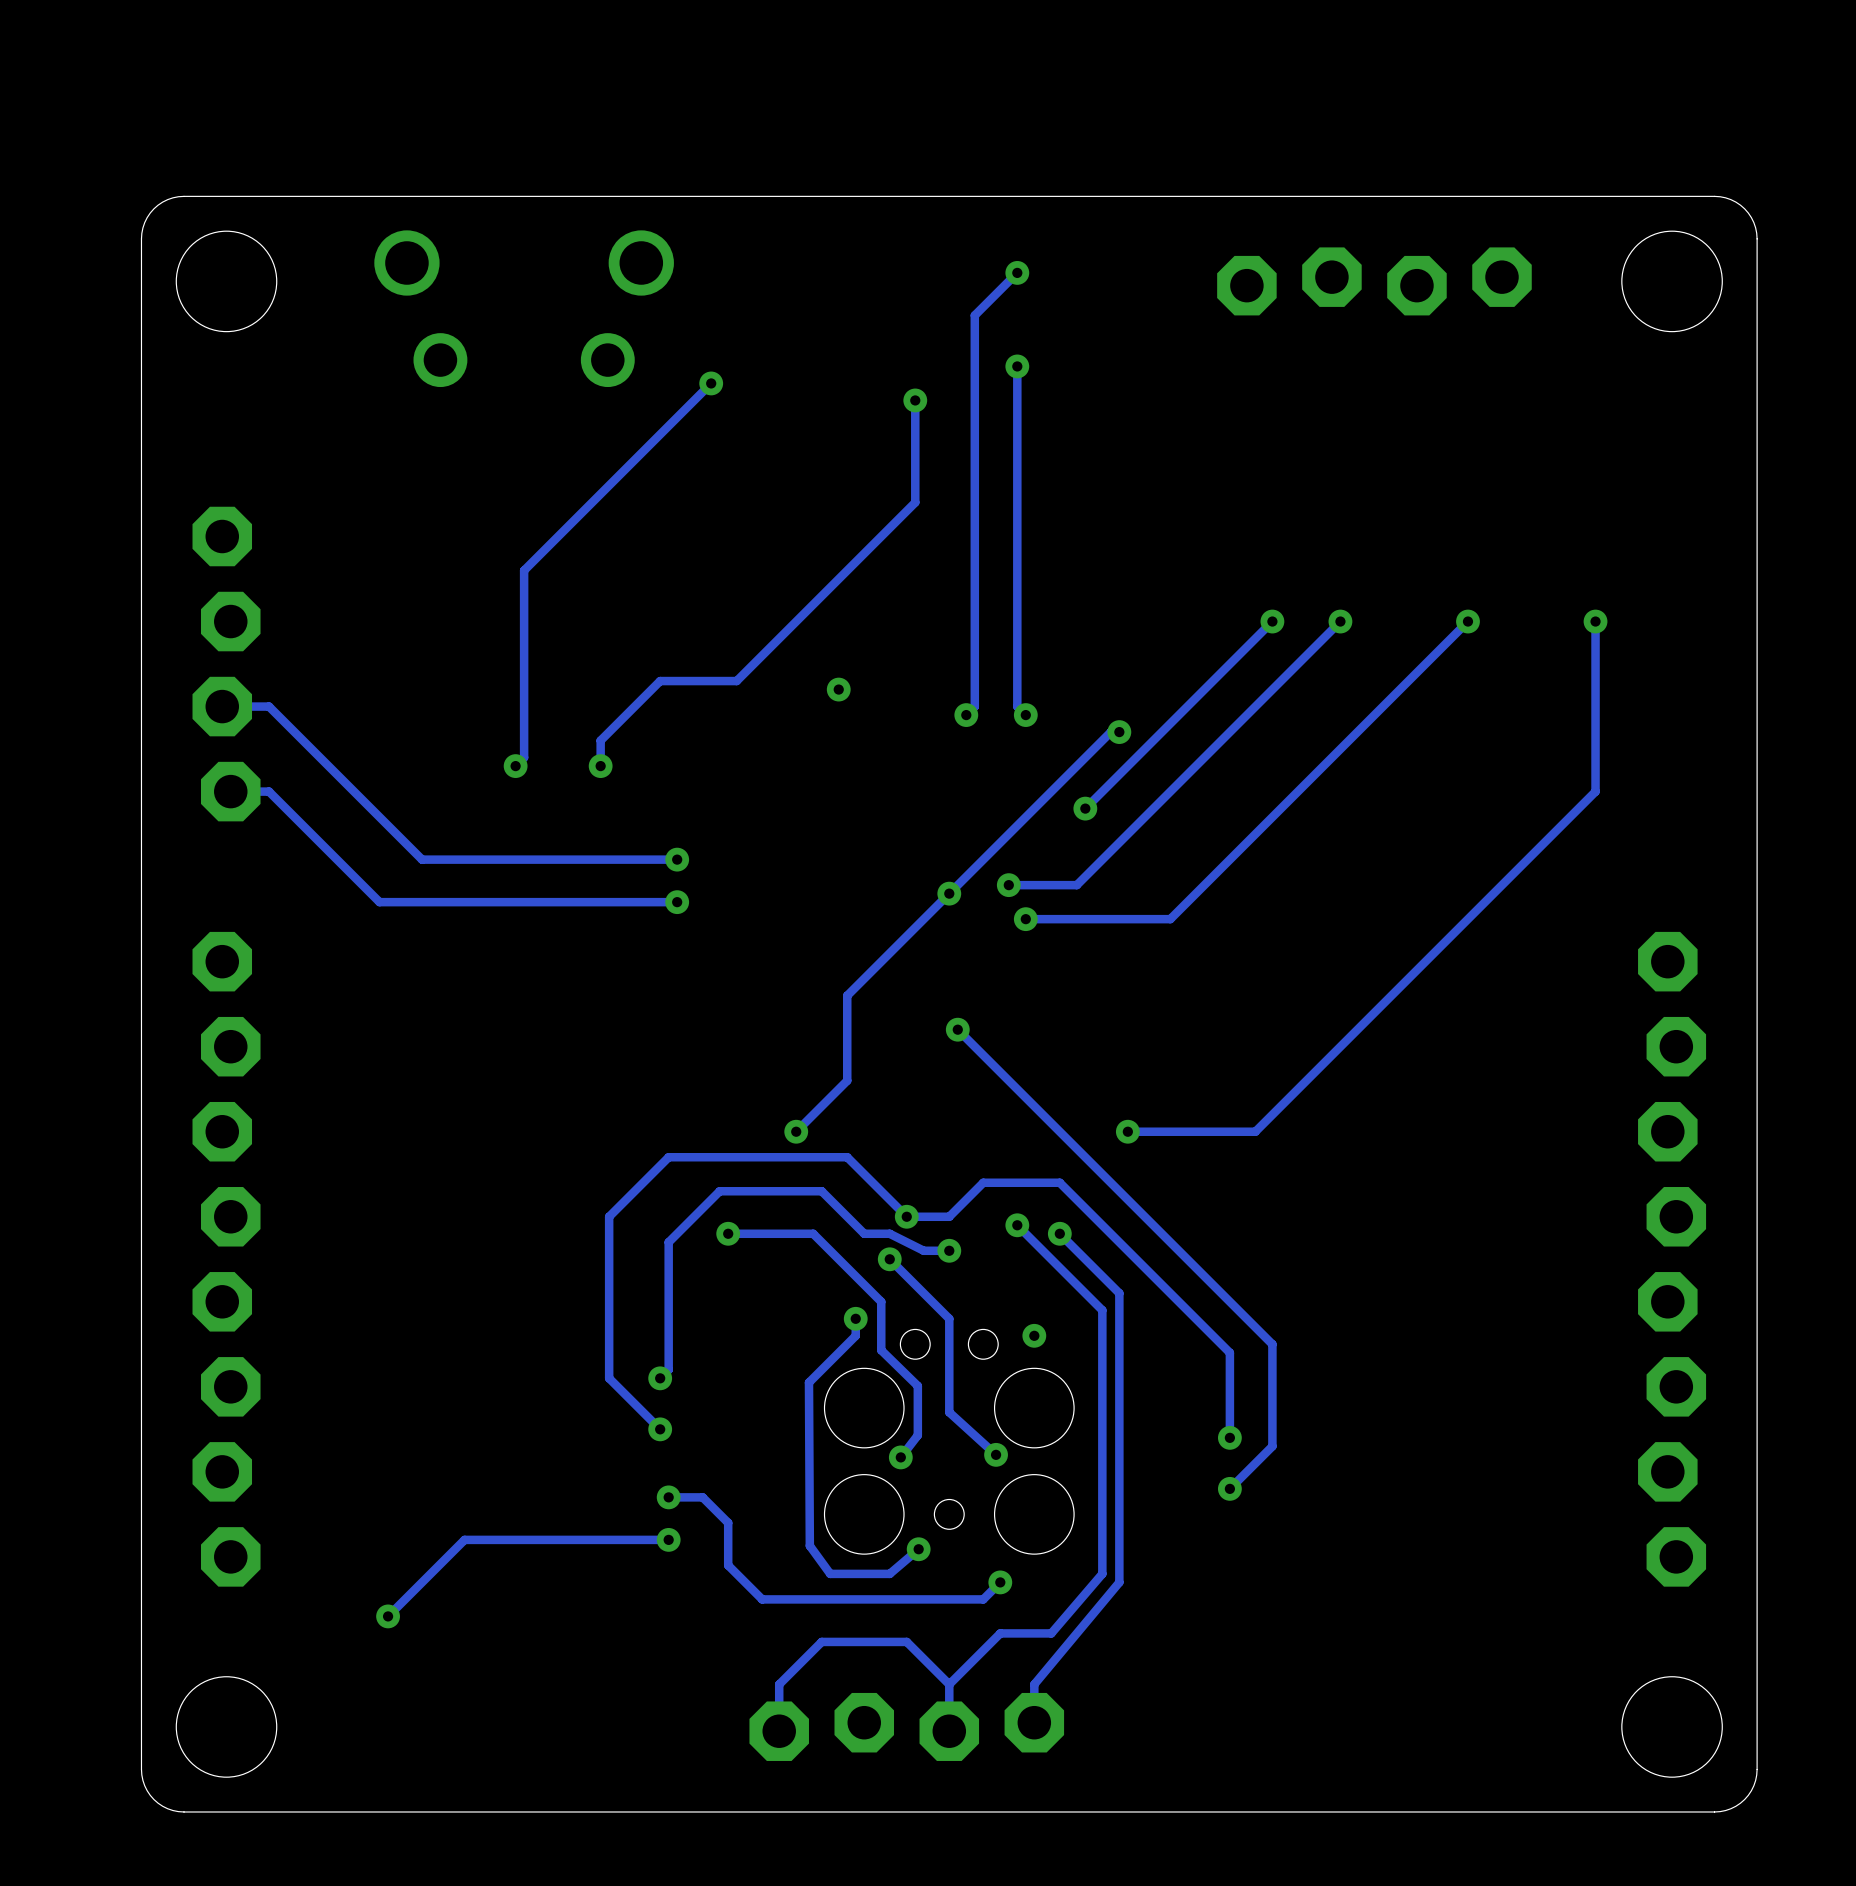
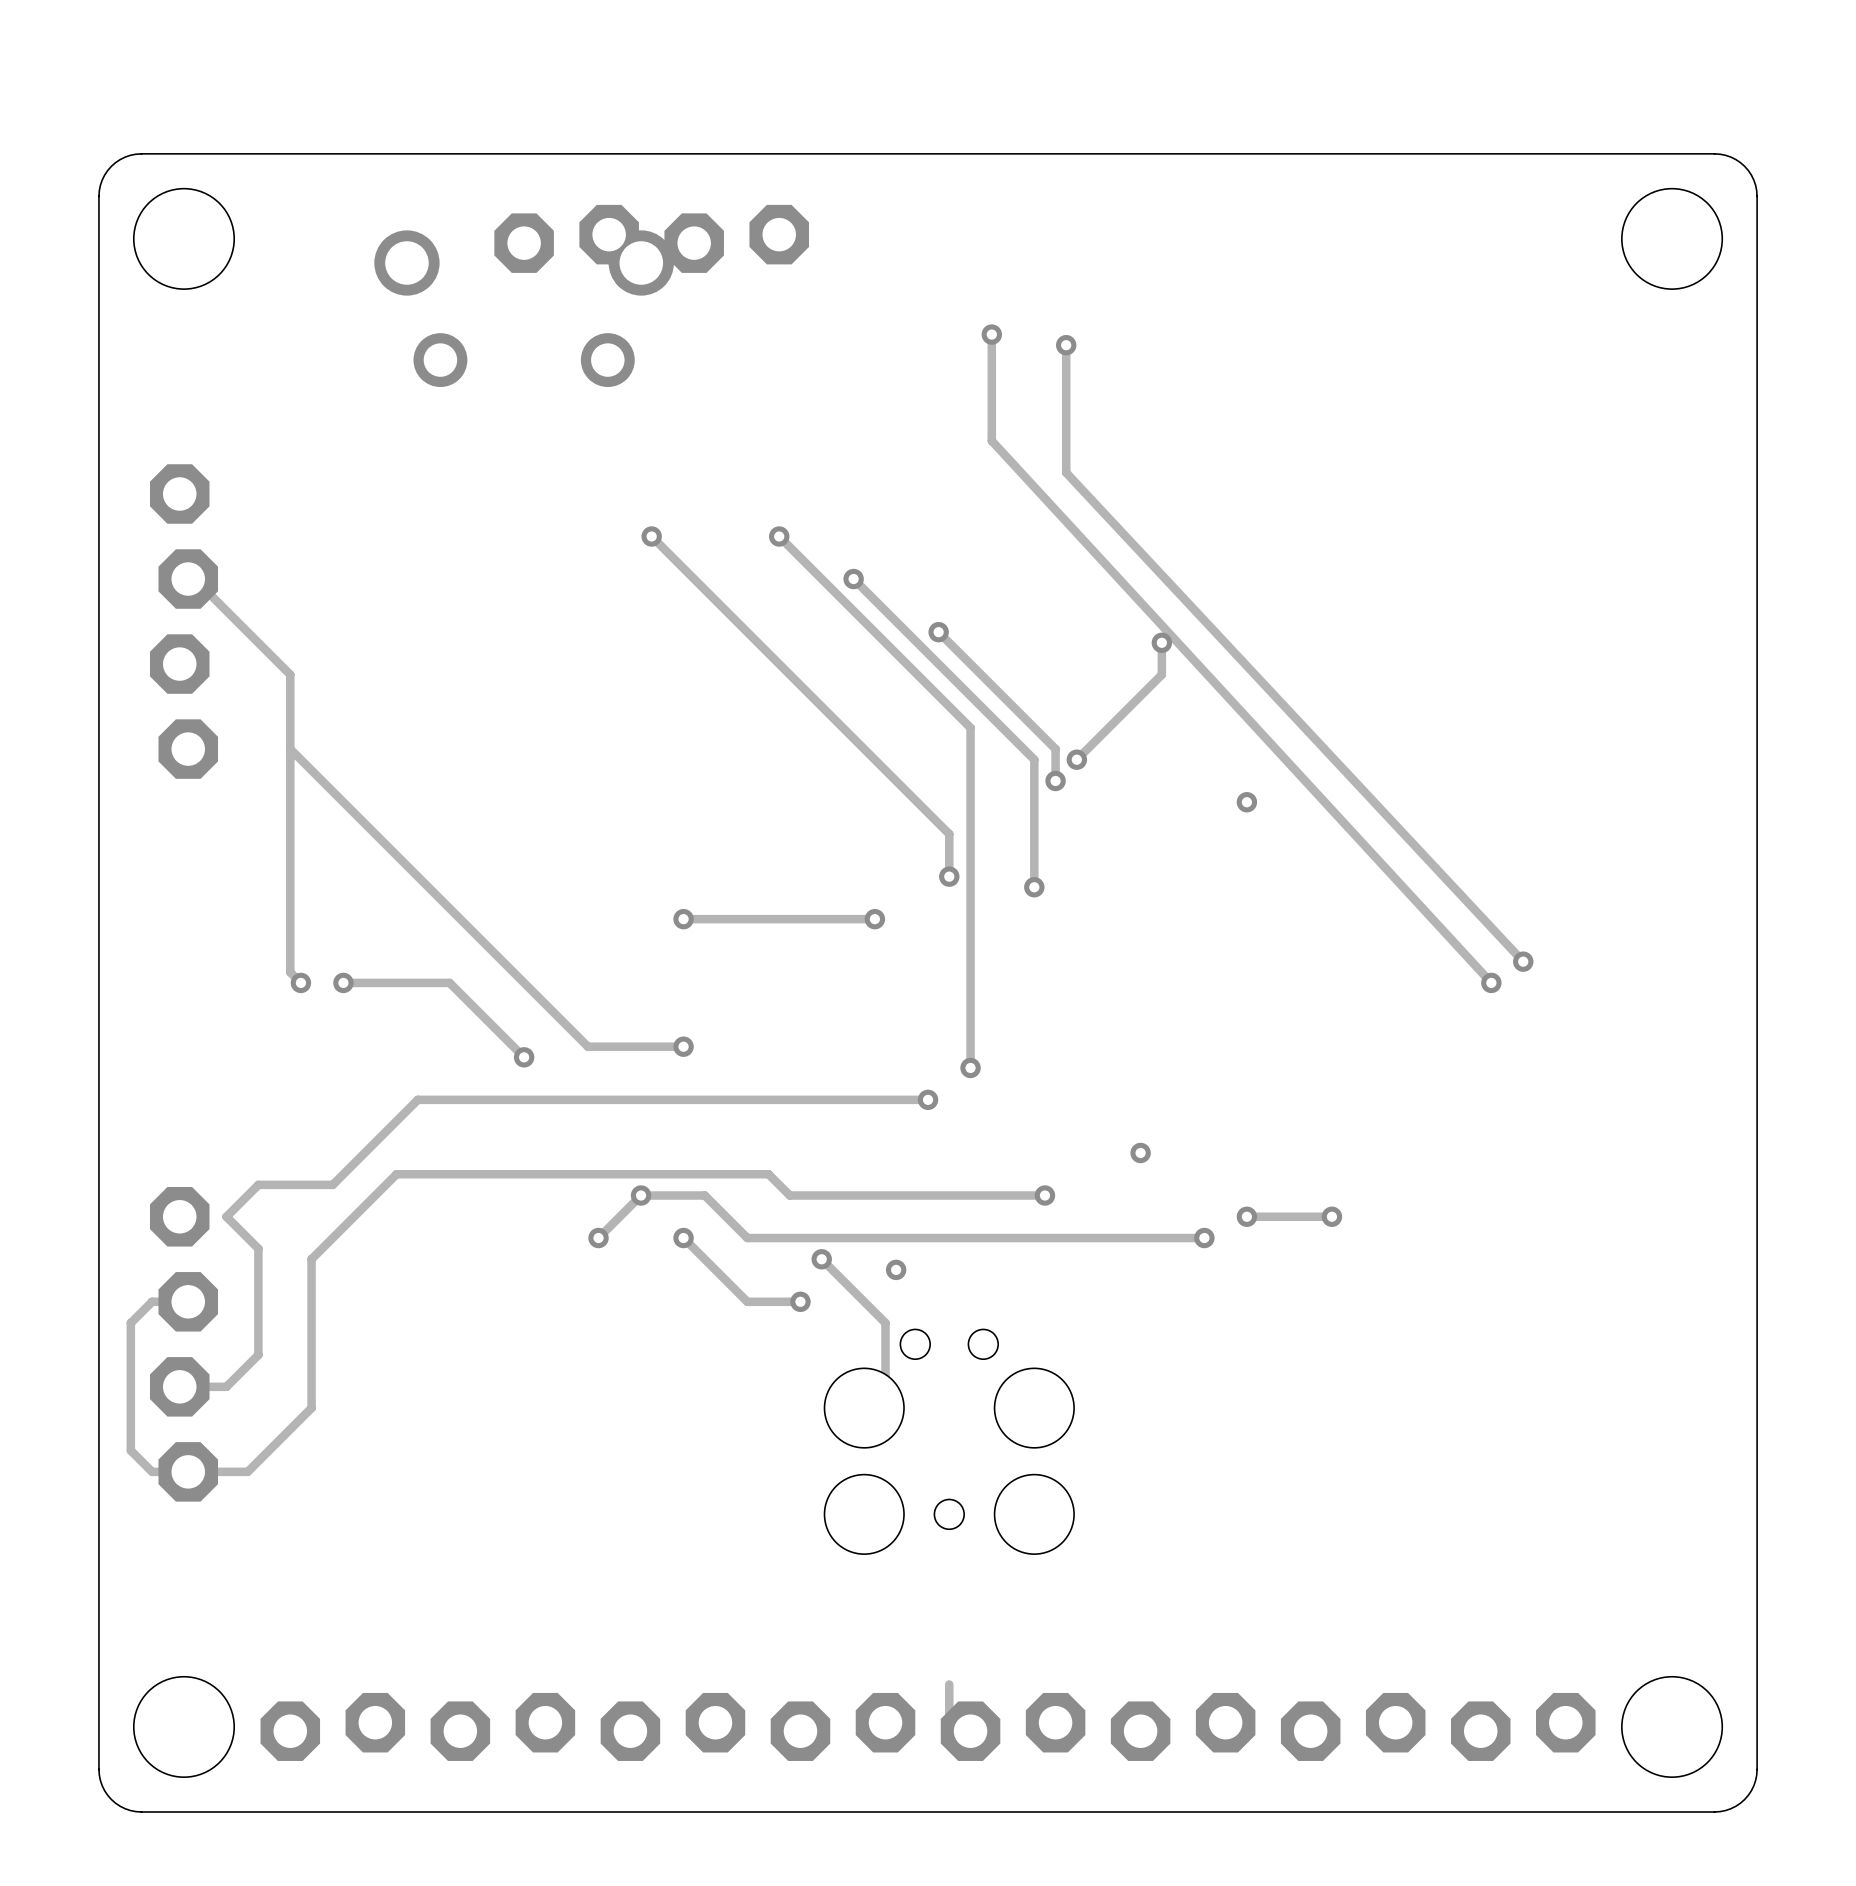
part: none -> (651, 238)
board edge: (1757, 238) (1753, 222) (1744, 208) (1730, 199) (1714, 196) (183, 196) (167, 199) (153, 208) (144, 222) (141, 238) (141, 1769) (144, 1785) (153, 1799) (167, 1808) (183, 1811) -> (1757, 238) (1756, 190) (1751, 175) (1735, 159) (1714, 153) (141, 153) (125, 157) (111, 166) (102, 180) (98, 196) (98, 1769) (104, 1790) (120, 1806) (135, 1811) (183, 1811)
track: (1017, 272) (974, 315) (974, 706) (966, 715) -> none
via: (1017, 272) -> none
round board edge position: (226, 281) -> (183, 238)
part: (1374, 281) -> none
round board edge position: (1672, 281) -> (1672, 238)
track: none -> (991, 334) (991, 440) (1491, 982)
via: none -> (991, 334)
track: none -> (1066, 345) (1066, 472) (1523, 961)
via: none -> (1066, 345)
track: (1017, 366) (1017, 706) (1025, 715) -> none
via: (1017, 366) -> none
track: (711, 383) (524, 570) (524, 757) (515, 766) -> none
via: (711, 383) -> none
track: (915, 400) (915, 502) (736, 681) (660, 681) (600, 740) (600, 766) -> none
via: (915, 400) -> none
track: none -> (651, 536) (949, 834) (949, 876)
via: none -> (651, 536)
track: none -> (779, 536) (970, 727) (970, 1067)
via: none -> (779, 536)
track: none -> (188, 579) (194, 579) (290, 674) (290, 972) (300, 982)
track: none -> (853, 579) (1034, 759) (1034, 887)
via: none -> (853, 579)
track: (1272, 621) (1085, 808) -> none
via: (1272, 621) -> none
track: (1340, 621) (1076, 885) (1008, 885) -> none
via: (1340, 621) -> none
track: (1467, 621) (1170, 919) (1025, 919) -> none
via: (1467, 621) -> none
track: (1595, 621) (1595, 791) (1255, 1131) (1127, 1131) -> none
via: (1595, 621) -> none
track: none -> (938, 632) (1055, 749) (1055, 780)
via: none -> (938, 632)
track: none -> (1161, 642) (1161, 674) (1076, 759)
via: none -> (1161, 642)
part position: (226, 664) -> (183, 621)
via: (838, 689) -> none
track: (222, 706) (269, 706) (422, 859) (677, 859) -> none
via: (966, 715) -> none
via: (1025, 715) -> none
track: (1119, 732) (1110, 732) (847, 995) (847, 1080) (796, 1131) -> none
via: (1119, 732) -> none
track: none -> (290, 749) (587, 1046) (683, 1046)
via: none -> (1076, 759)
via: (515, 766) -> none
via: (600, 766) -> none
via: none -> (1055, 780)
track: (230, 791) (269, 791) (379, 902) (677, 902) -> none
via: none -> (1246, 802)
via: (1085, 808) -> none
via: (677, 859) -> none
via: (1008, 885) -> none
via: none -> (1034, 887)
via position: (949, 893) -> (949, 876)
via position: (677, 902) -> (683, 919)
track: none -> (874, 919) (683, 919)
via: none -> (874, 919)
via: (1025, 919) -> none
via: none -> (1523, 961)
via: none -> (300, 982)
track: none -> (343, 982) (449, 982) (524, 1057)
via: none -> (343, 982)
via: none -> (1491, 982)
track: (957, 1029) (1272, 1344) (1272, 1446) (1229, 1488) -> none
via: (957, 1029) -> none
via: none -> (683, 1046)
via: none -> (524, 1057)
via: none -> (970, 1067)
track: none -> (928, 1099) (417, 1099) (332, 1184) (258, 1184) (226, 1216) (258, 1248) (258, 1354) (226, 1386) (179, 1386)
via: none -> (928, 1099)
via: (796, 1131) -> none
via position: (1127, 1131) -> (1140, 1152)
via: none -> (641, 1195)
track: none -> (1044, 1195) (789, 1195) (768, 1174) (396, 1174) (311, 1259) (311, 1408) (247, 1471) (152, 1471) (130, 1450) (130, 1323) (152, 1301) (188, 1301)
via: none -> (1044, 1195)
via: (906, 1216) -> none
via: none -> (1246, 1216)
track: none -> (1331, 1216) (1246, 1216)
via: none -> (1331, 1216)
track: (1017, 1225) (1102, 1310) (1102, 1573) (1051, 1633) (1000, 1633) (949, 1684) (906, 1641) (821, 1641) (779, 1684) (779, 1731) -> none
via: (1017, 1225) -> none
track: (728, 1233) (813, 1233) (881, 1301) (881, 1350) (917, 1385) (917, 1435) (900, 1457) -> none
via: (728, 1233) -> none
track: (1059, 1233) (1119, 1293) (1119, 1582) (1034, 1684) (1034, 1722) -> none
via: (1059, 1233) -> none
via: none -> (598, 1238)
track: none -> (683, 1238) (747, 1301) (800, 1301)
via: none -> (683, 1238)
track: none -> (1204, 1238) (747, 1238) (704, 1195) (641, 1195) (598, 1238)
via: none -> (1204, 1238)
track: (949, 1250) (923, 1250) (889, 1233) (864, 1233) (821, 1191) (719, 1191) (668, 1242) (668, 1369) (660, 1378) -> none
via: (949, 1250) -> none
part: (226, 1259) -> none
track: none -> (821, 1259) (885, 1323) (885, 1408)
via: none -> (821, 1259)
track: (889, 1259) (949, 1318) (949, 1412) (996, 1454) -> none
via position: (889, 1259) -> (896, 1269)
part: (1672, 1259) -> none
via: none -> (800, 1301)
track: (855, 1318) (855, 1335) (808, 1382) (809, 1545) (830, 1573) (889, 1573) (918, 1549) -> none
via: (855, 1318) -> none
via: (1034, 1335) -> none
part: none -> (183, 1344)
via: (660, 1378) -> none
track: (660, 1429) (609, 1378) (609, 1216) (668, 1157) (847, 1157) (906, 1216) (949, 1216) (983, 1182) (1059, 1182) (1229, 1352) (1229, 1437) -> none
via: (660, 1429) -> none
via: (1229, 1437) -> none
via: (996, 1454) -> none
via: (900, 1457) -> none
via: (1229, 1488) -> none
track: (668, 1497) (702, 1497) (728, 1522) (728, 1565) (762, 1599) (983, 1599) (1000, 1582) -> none
via: (668, 1497) -> none
track: (668, 1539) (464, 1539) (388, 1616) -> none
via: (668, 1539) -> none
via: (918, 1549) -> none
via: (1000, 1582) -> none
via: (388, 1616) -> none
round board edge position: (226, 1726) -> (183, 1726)
part: none -> (587, 1726)
part: (906, 1726) -> none
part: none -> (1268, 1726)

